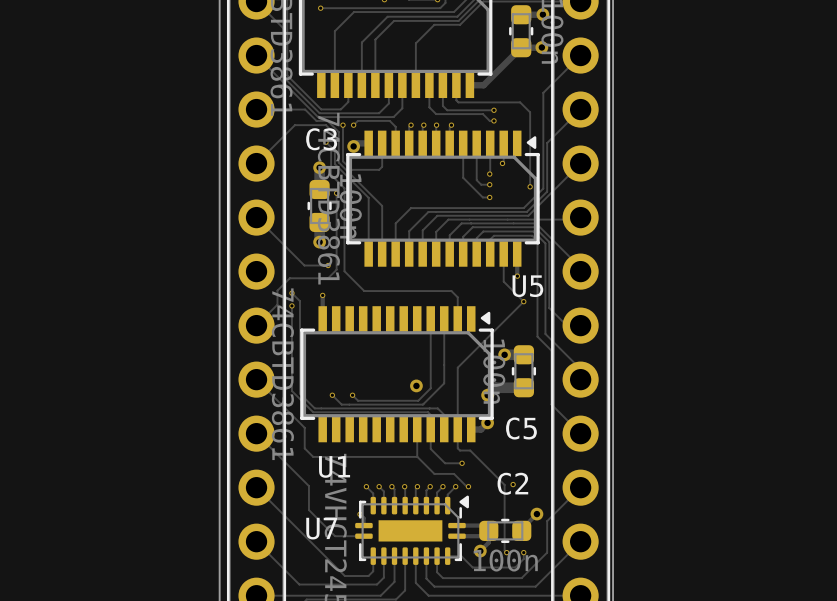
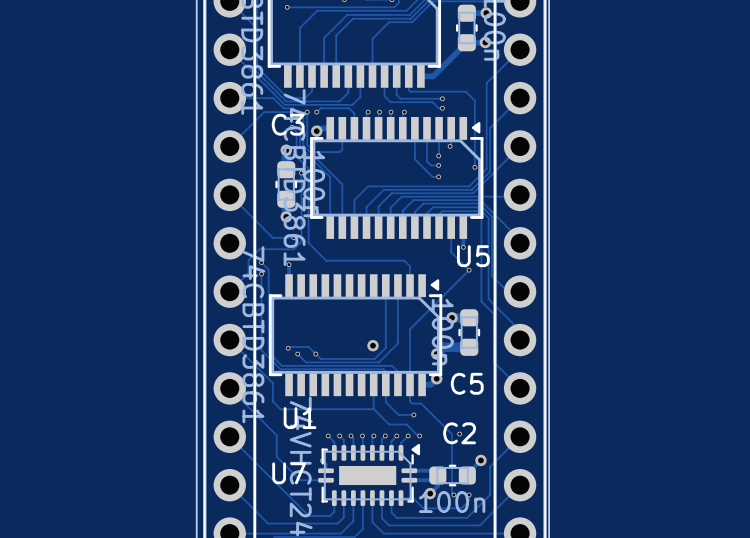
track: none -> (288, 348) (308, 346) (315, 354)
via: none -> (288, 348)

